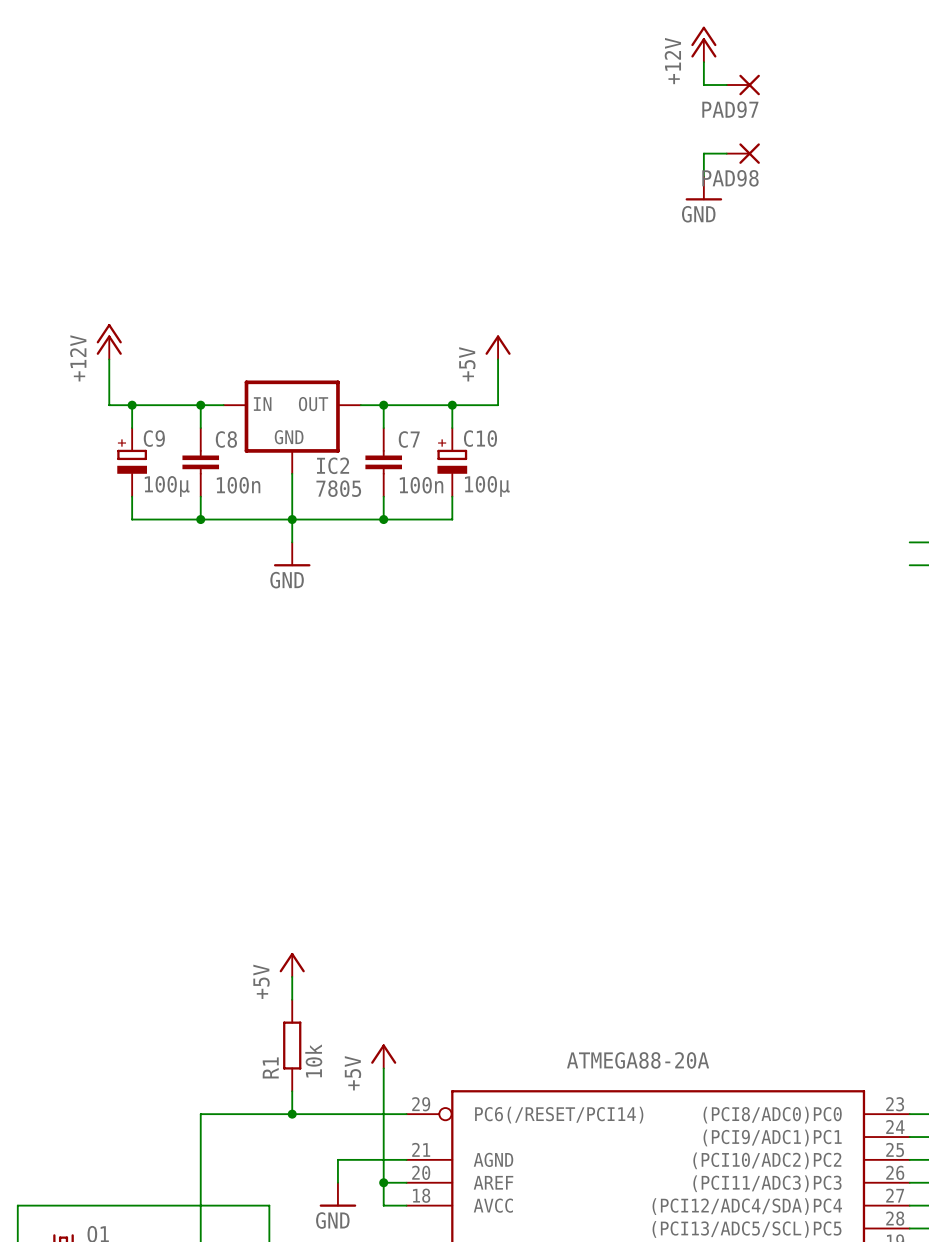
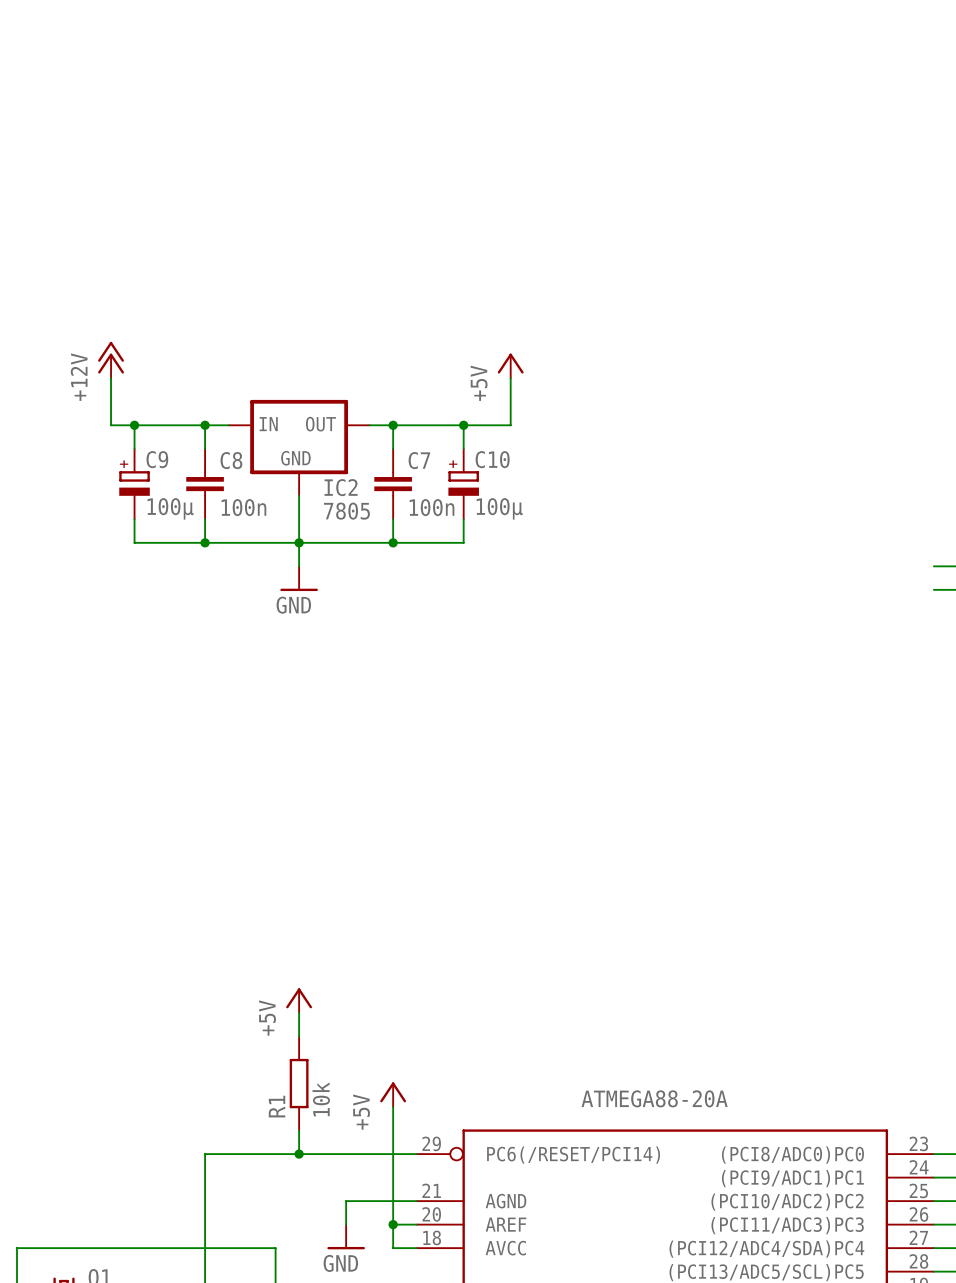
power symbol: +12V (703, 44) -> none
wire: (703, 62) (703, 85) (726, 85) -> none
PAD97: (743, 85) -> none
wire: (726, 153) (703, 153) (703, 176) -> none
PAD98: (743, 153) -> none
power symbol: GND (703, 188) -> none

